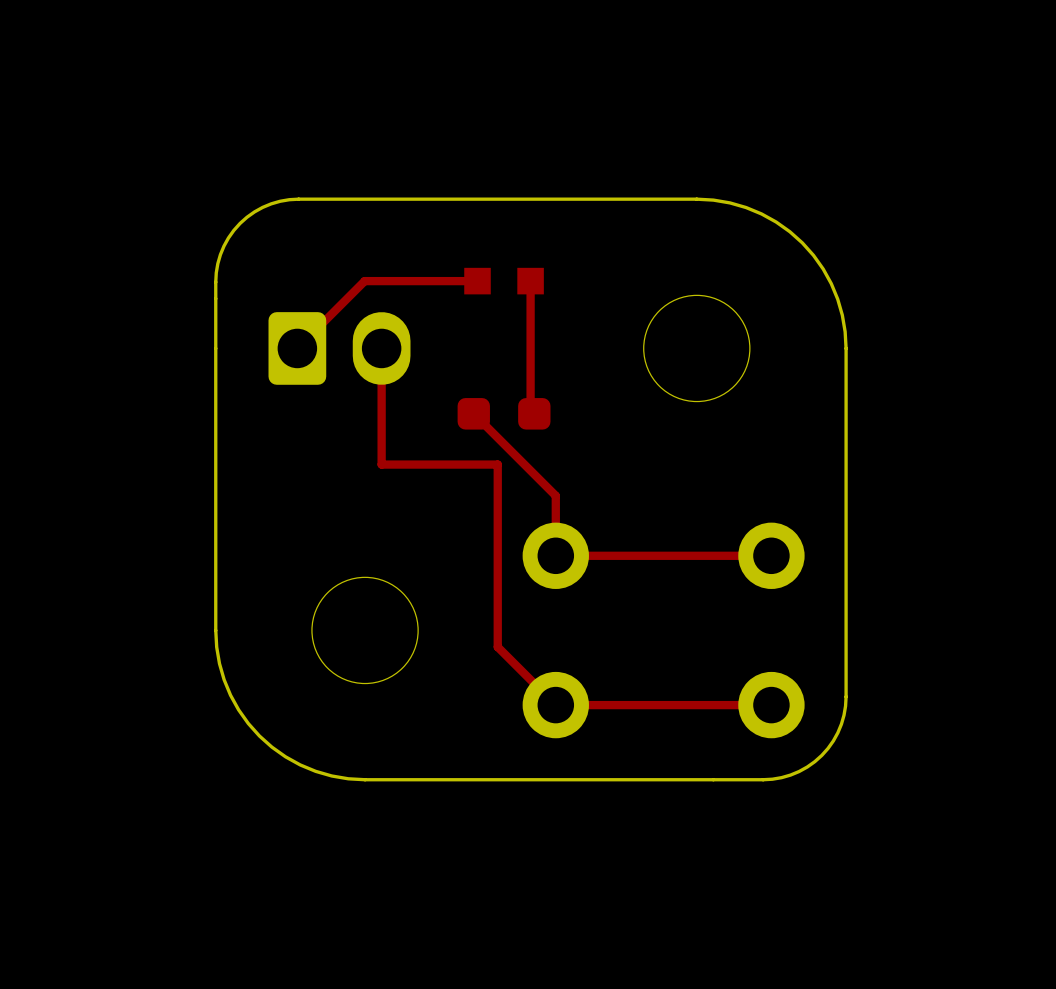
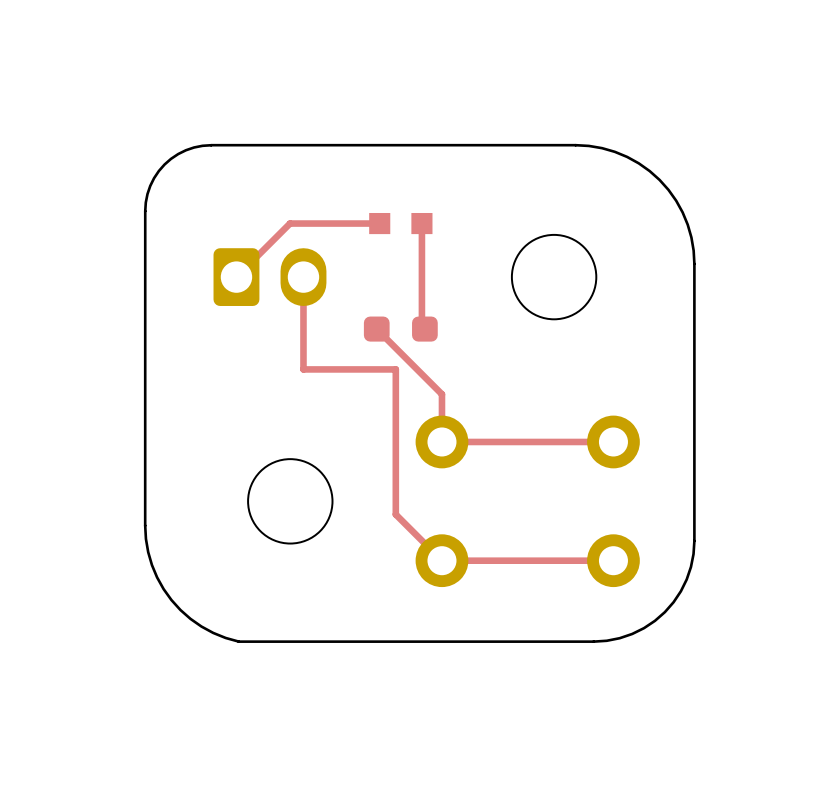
board edge: (696, 199) (289, 199) (271, 203) (254, 211) (233, 230) (220, 254) (215, 282) (216, 647) (219, 663) (230, 695) (248, 723) (271, 747) (285, 756) (315, 771) (331, 775) (365, 779) (772, 779) (799, 771) (814, 761) (827, 748) (841, 724) (846, 696) (846, 348) (842, 315) (831, 283) (823, 269) (802, 242) (789, 231) (776, 222) (746, 207) (713, 200) (696, 199) -> (575, 145) (614, 151) (649, 171) (676, 200) (691, 237) (694, 263) (694, 540) (690, 566) (680, 591) (673, 602) (654, 620) (632, 633) (606, 640) (593, 641) (238, 641) (213, 632) (190, 618) (171, 600) (157, 577) (148, 552) (145, 538) (145, 211) (147, 194) (158, 171) (178, 154) (194, 147) (211, 145) (575, 145)

